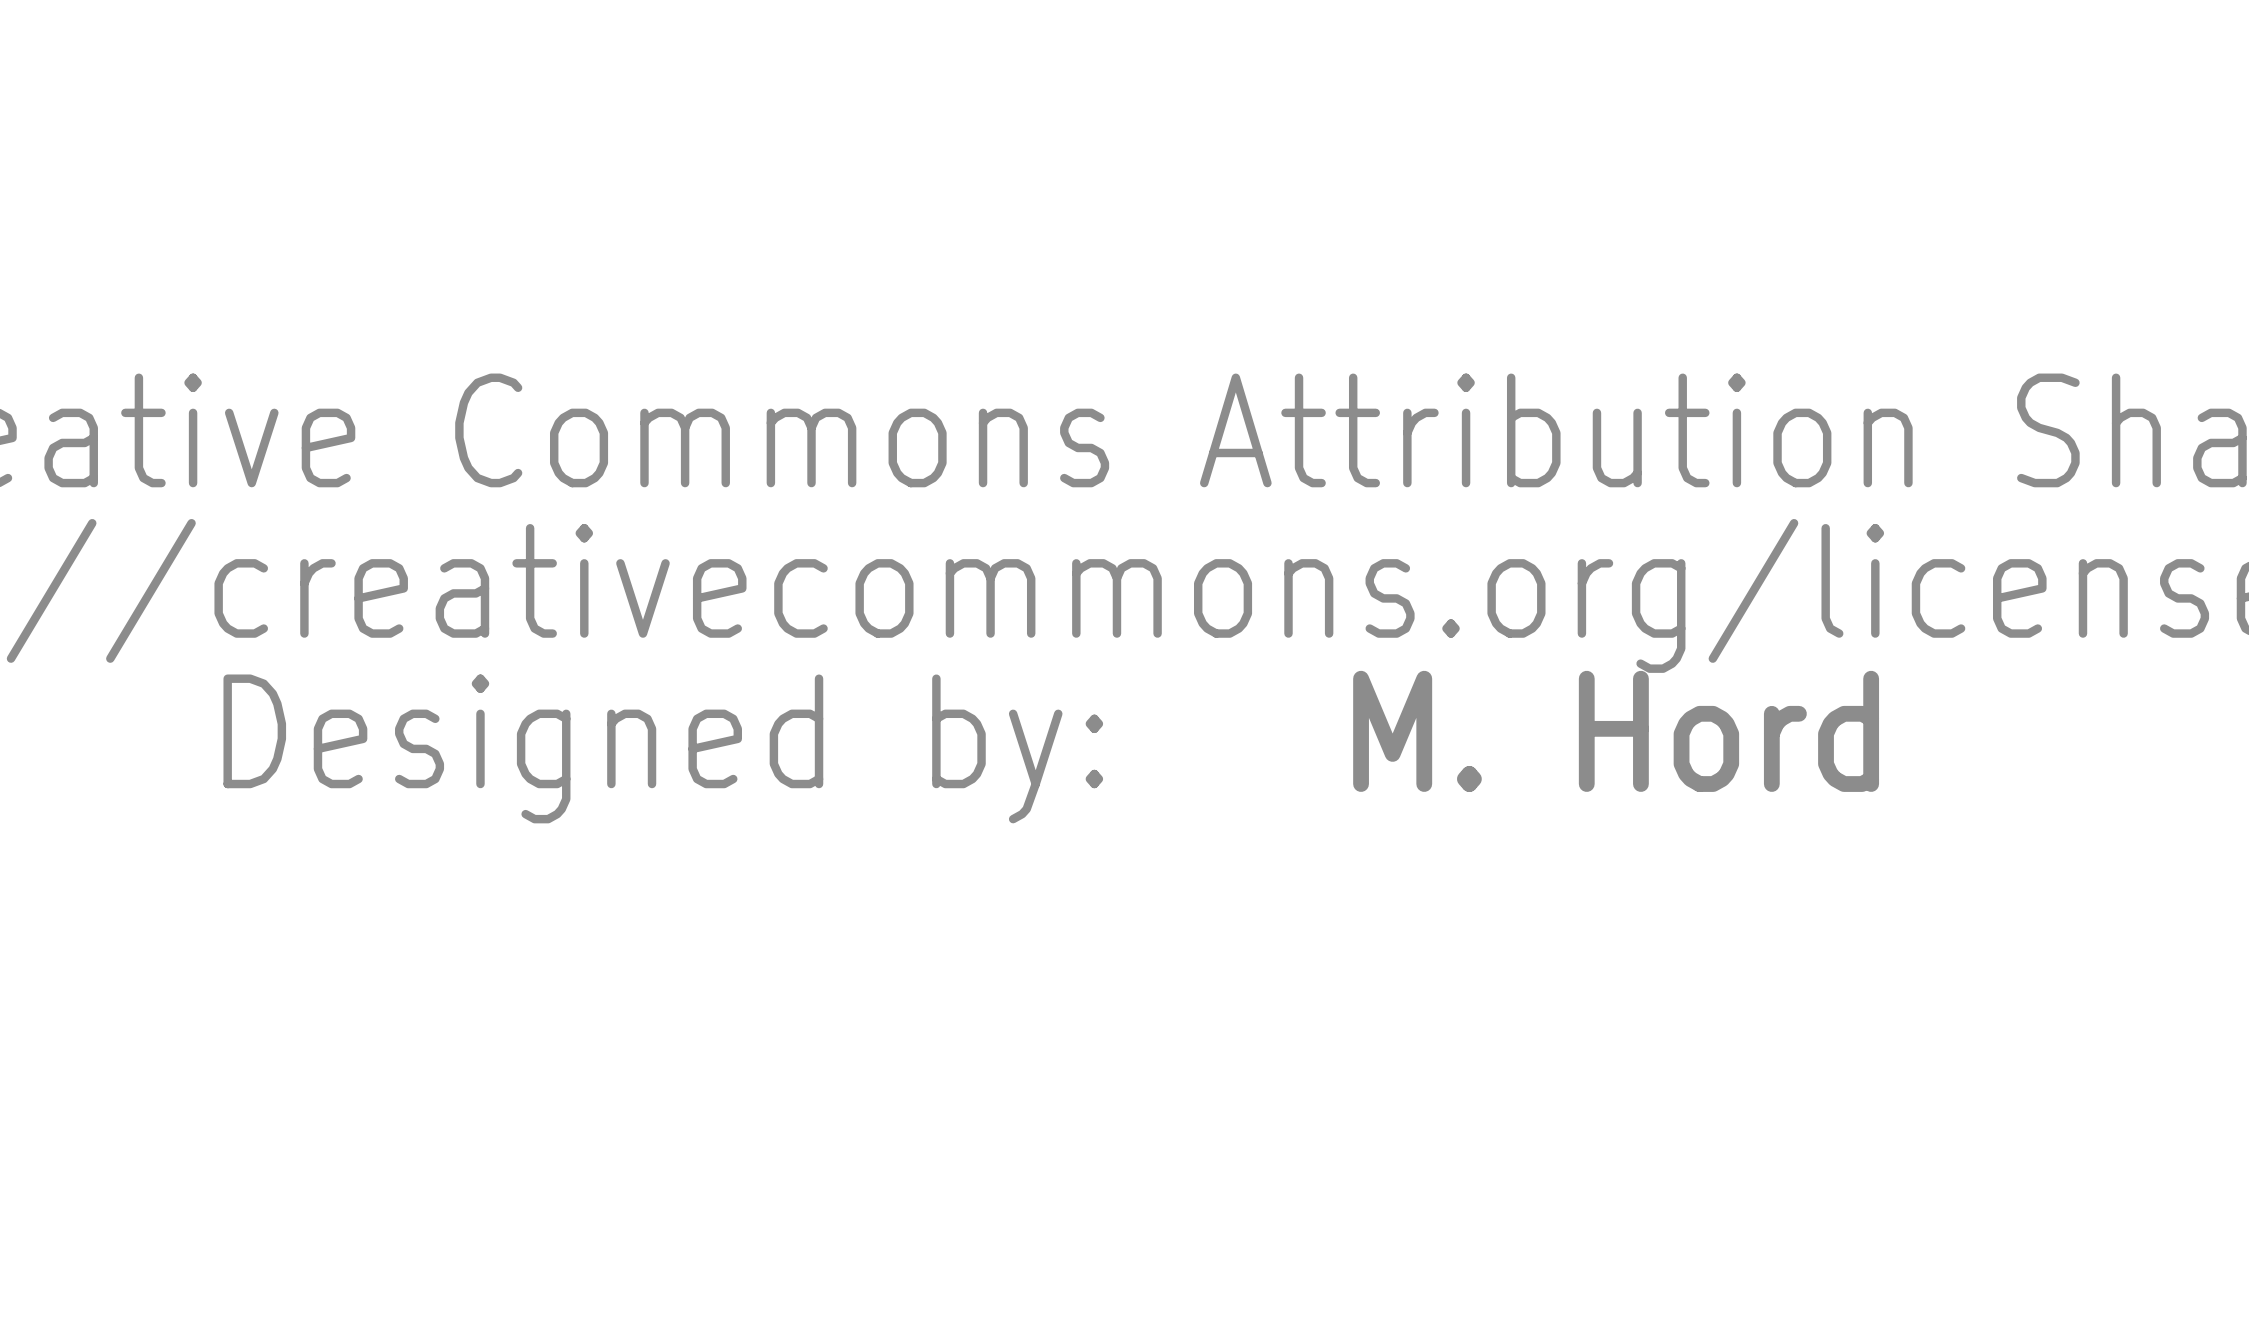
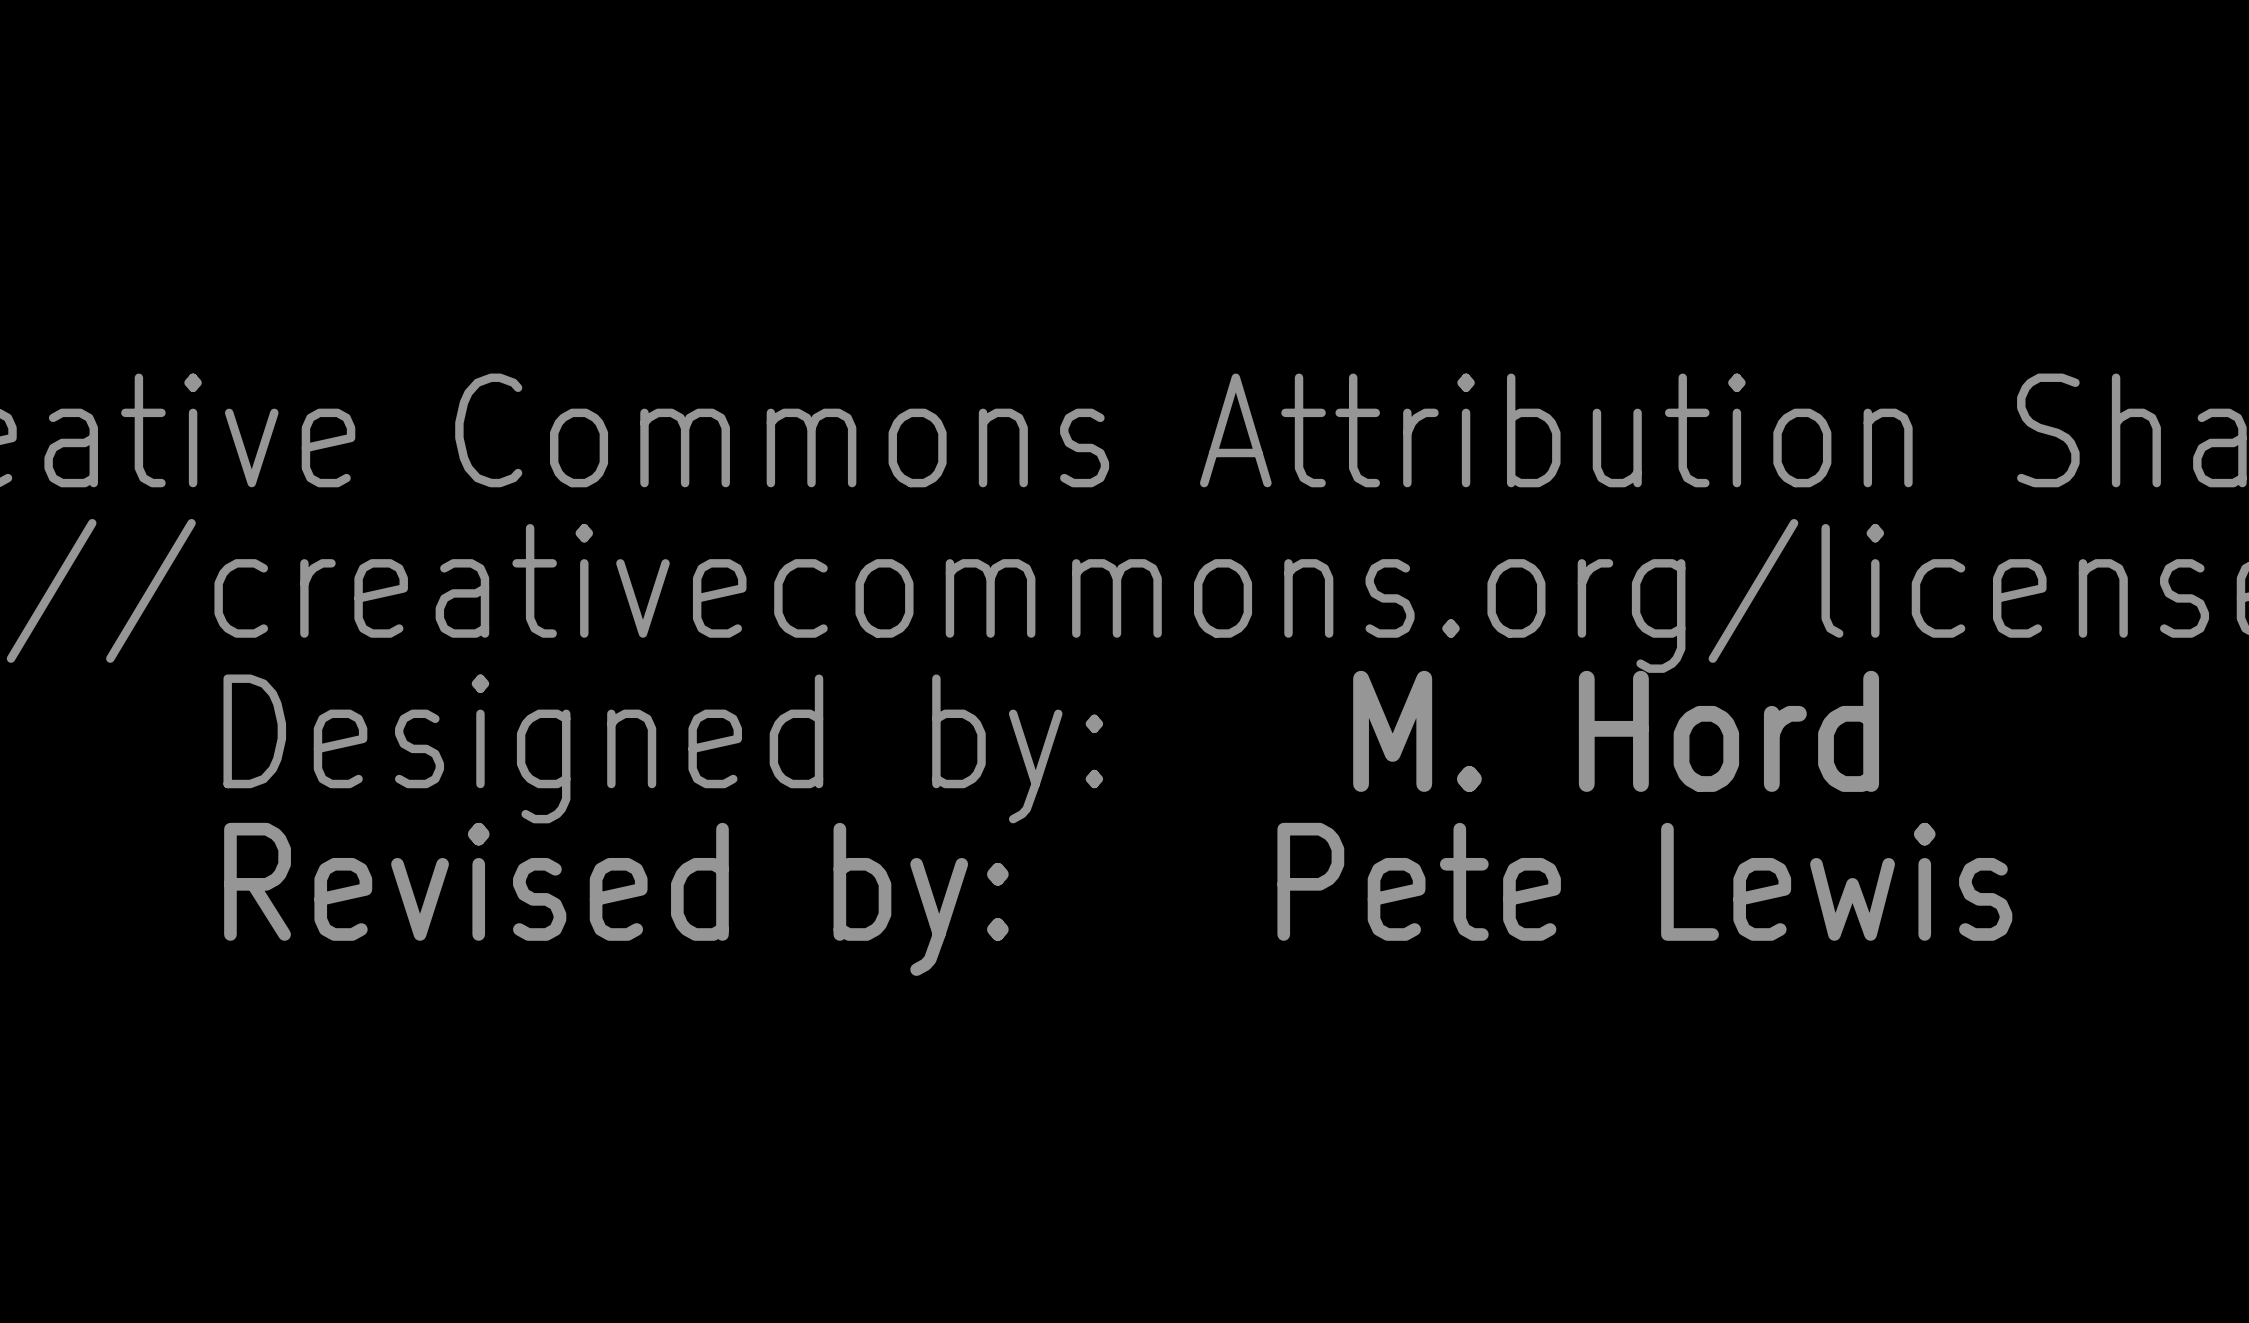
text: none -> Pete Lewis (1644, 881)
text: none -> Revised by: (616, 899)

